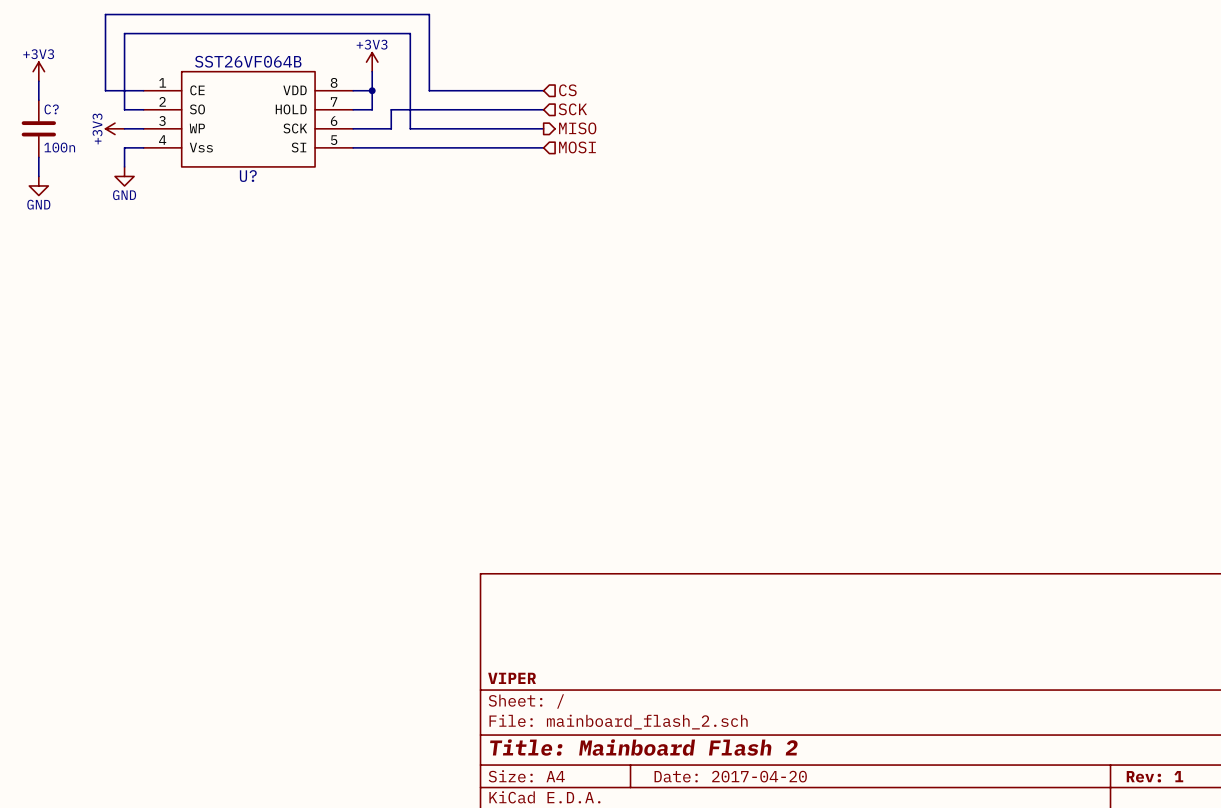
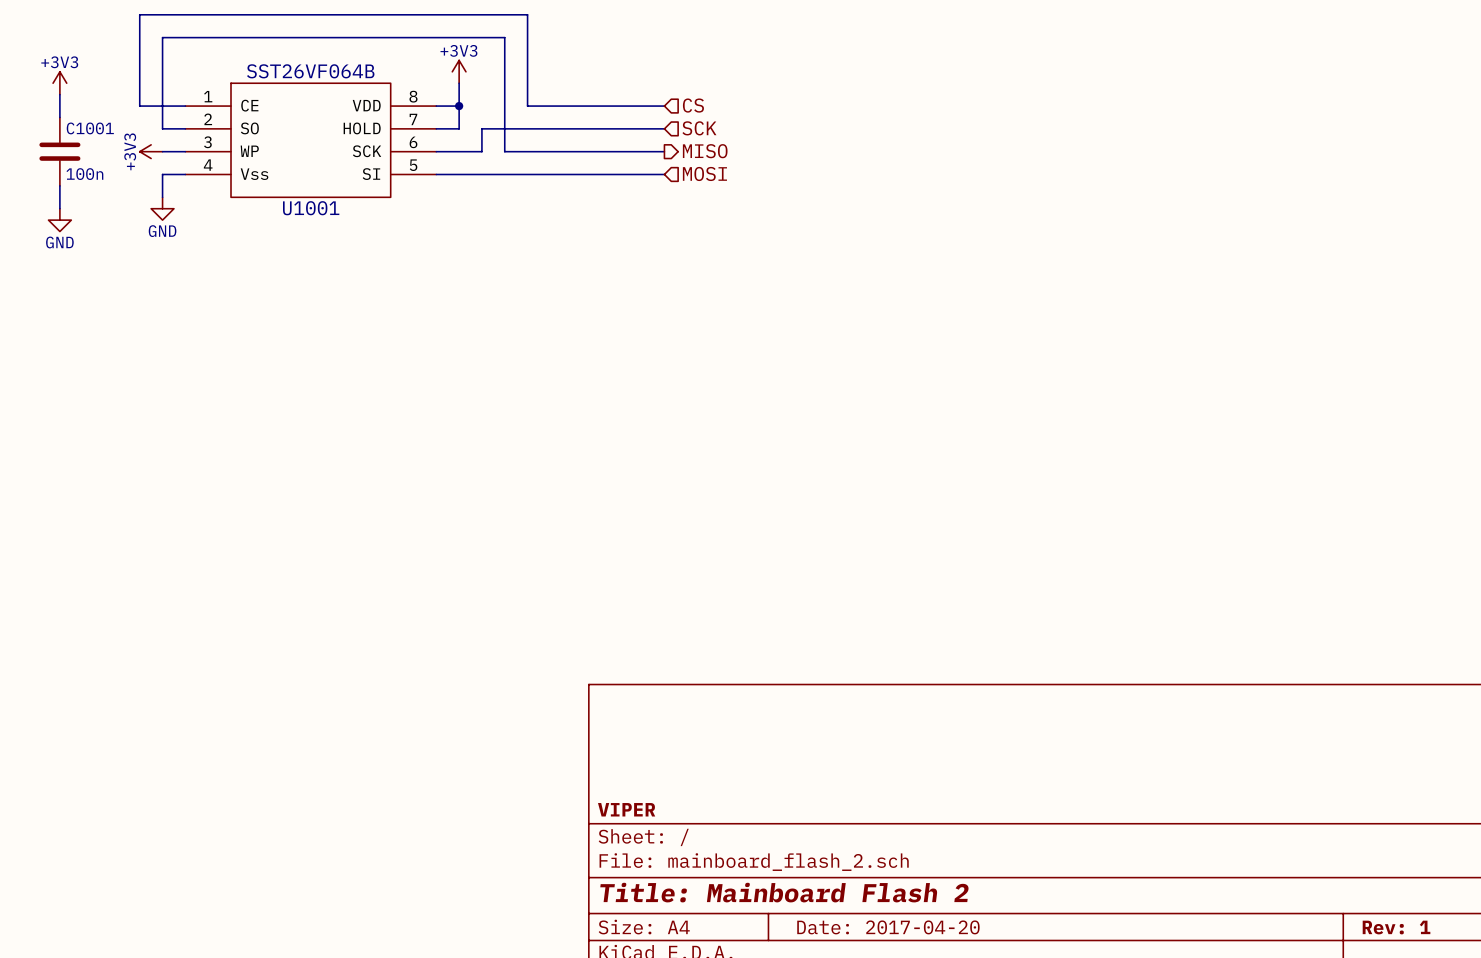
C? name: C? (51, 109) -> C1001 (90, 128)
U? name: U? (248, 176) -> U1001 (311, 208)

